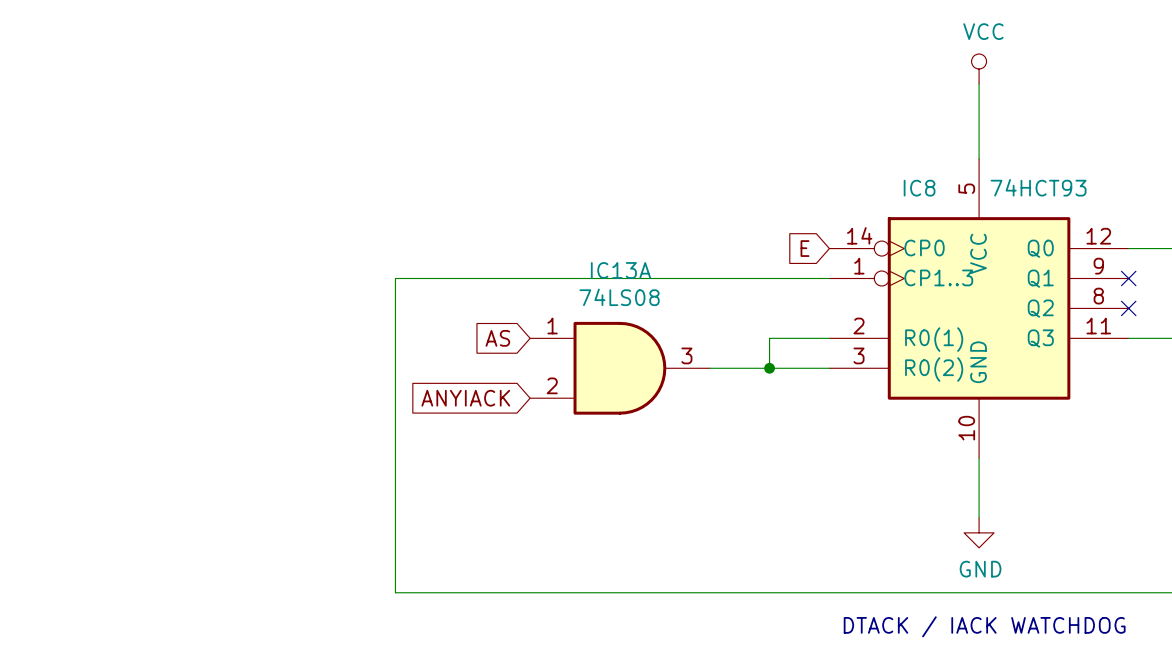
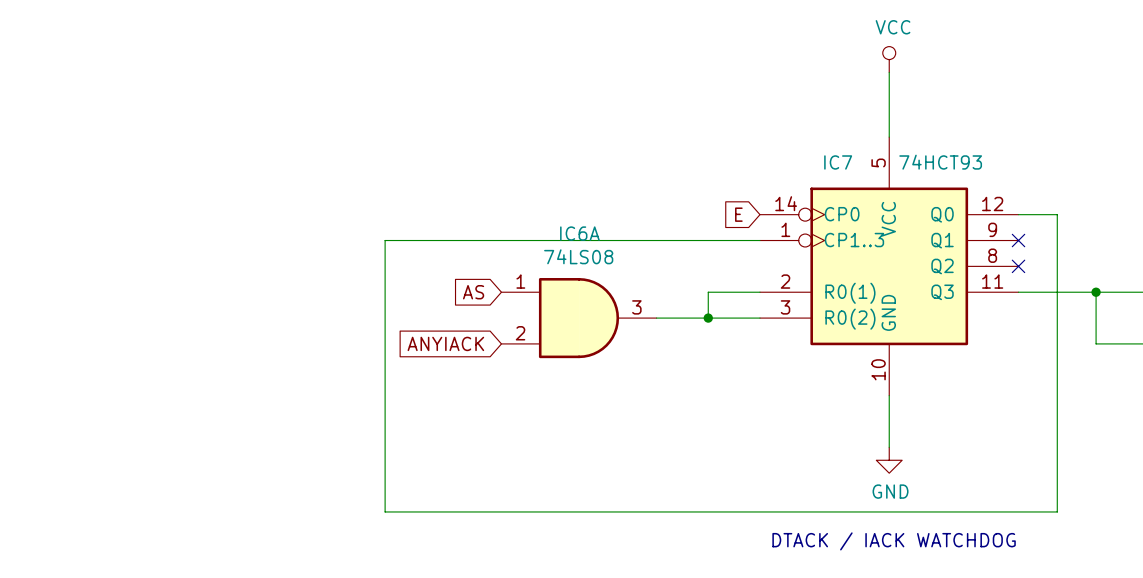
IC8 name: IC8 (919, 188) -> IC7 (838, 162)
IC13A name: IC13A (620, 270) -> IC6A (579, 233)

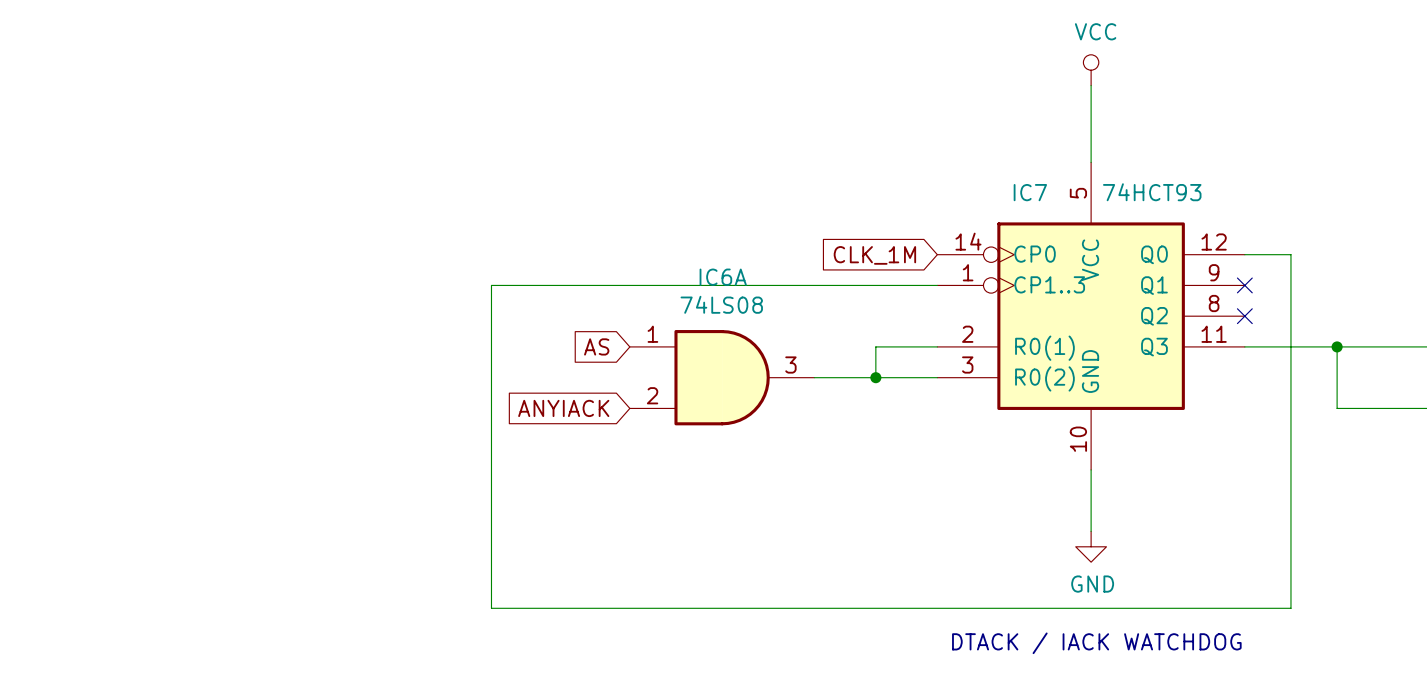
global label: E (738, 214) -> CLK_1M (874, 255)

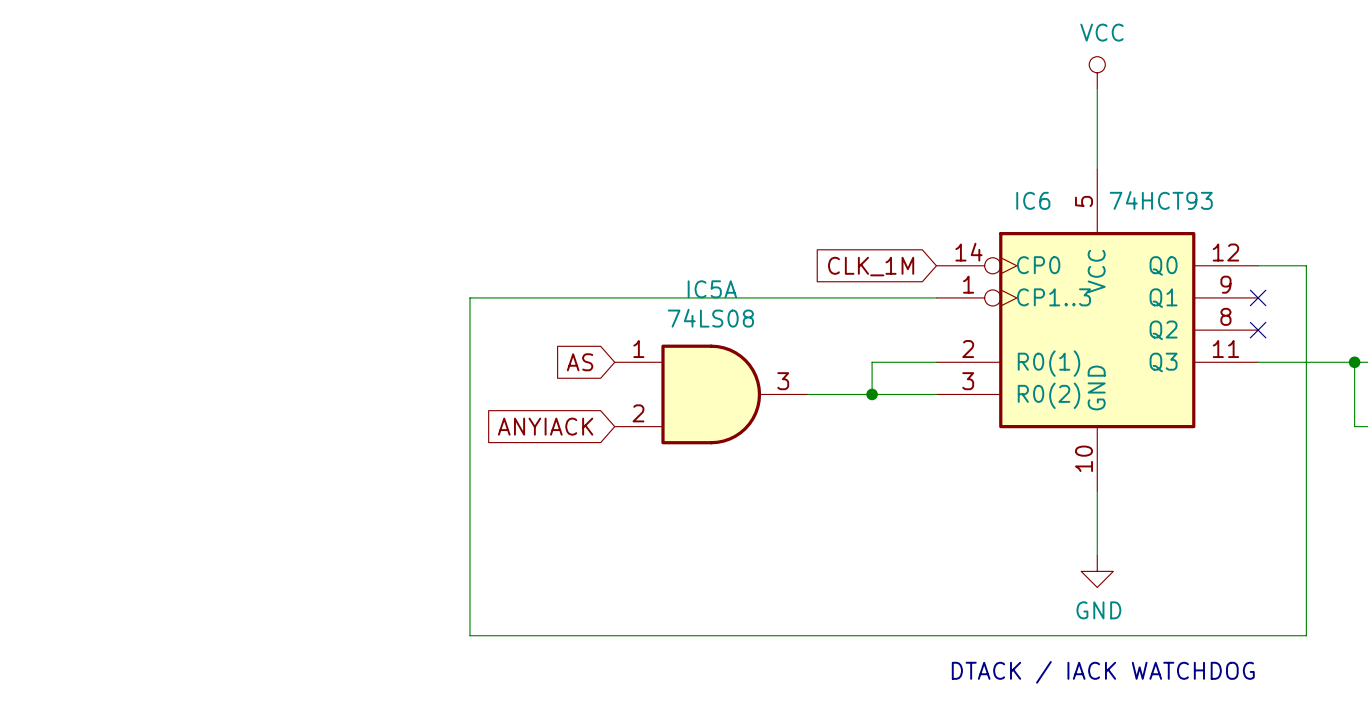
IC7 name: IC7 (1030, 192) -> IC6 (1033, 200)
IC6A name: IC6A (723, 277) -> IC5A (712, 289)

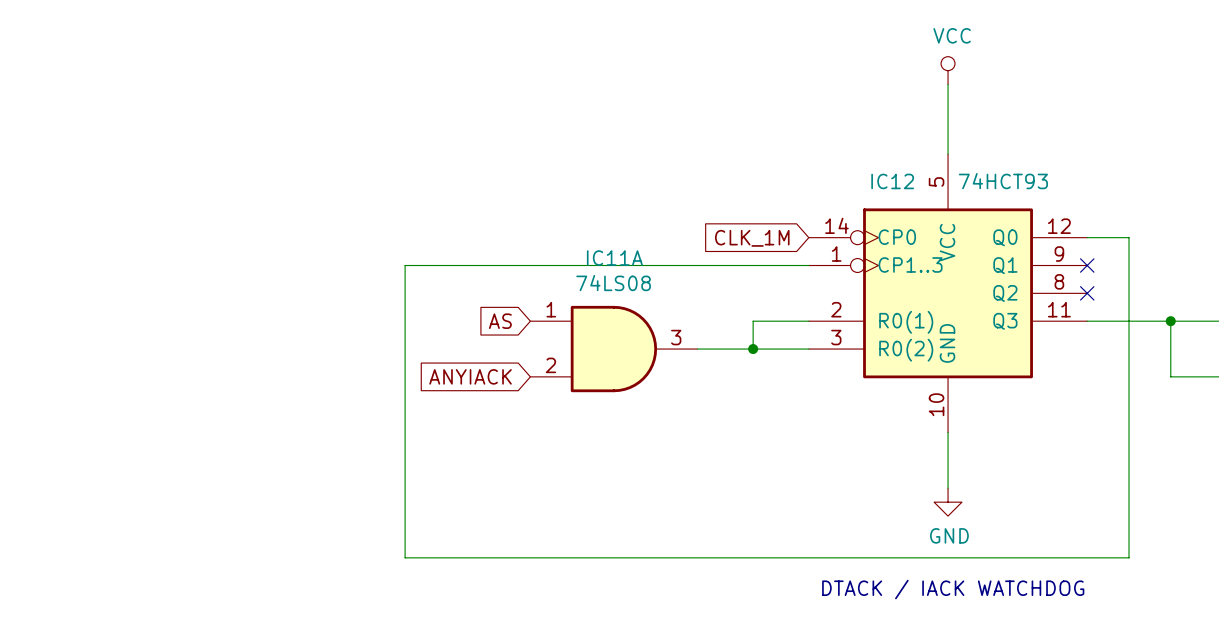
IC6 name: IC6 (1033, 200) -> IC12 (892, 181)
IC5A name: IC5A (712, 289) -> IC11A (614, 258)

